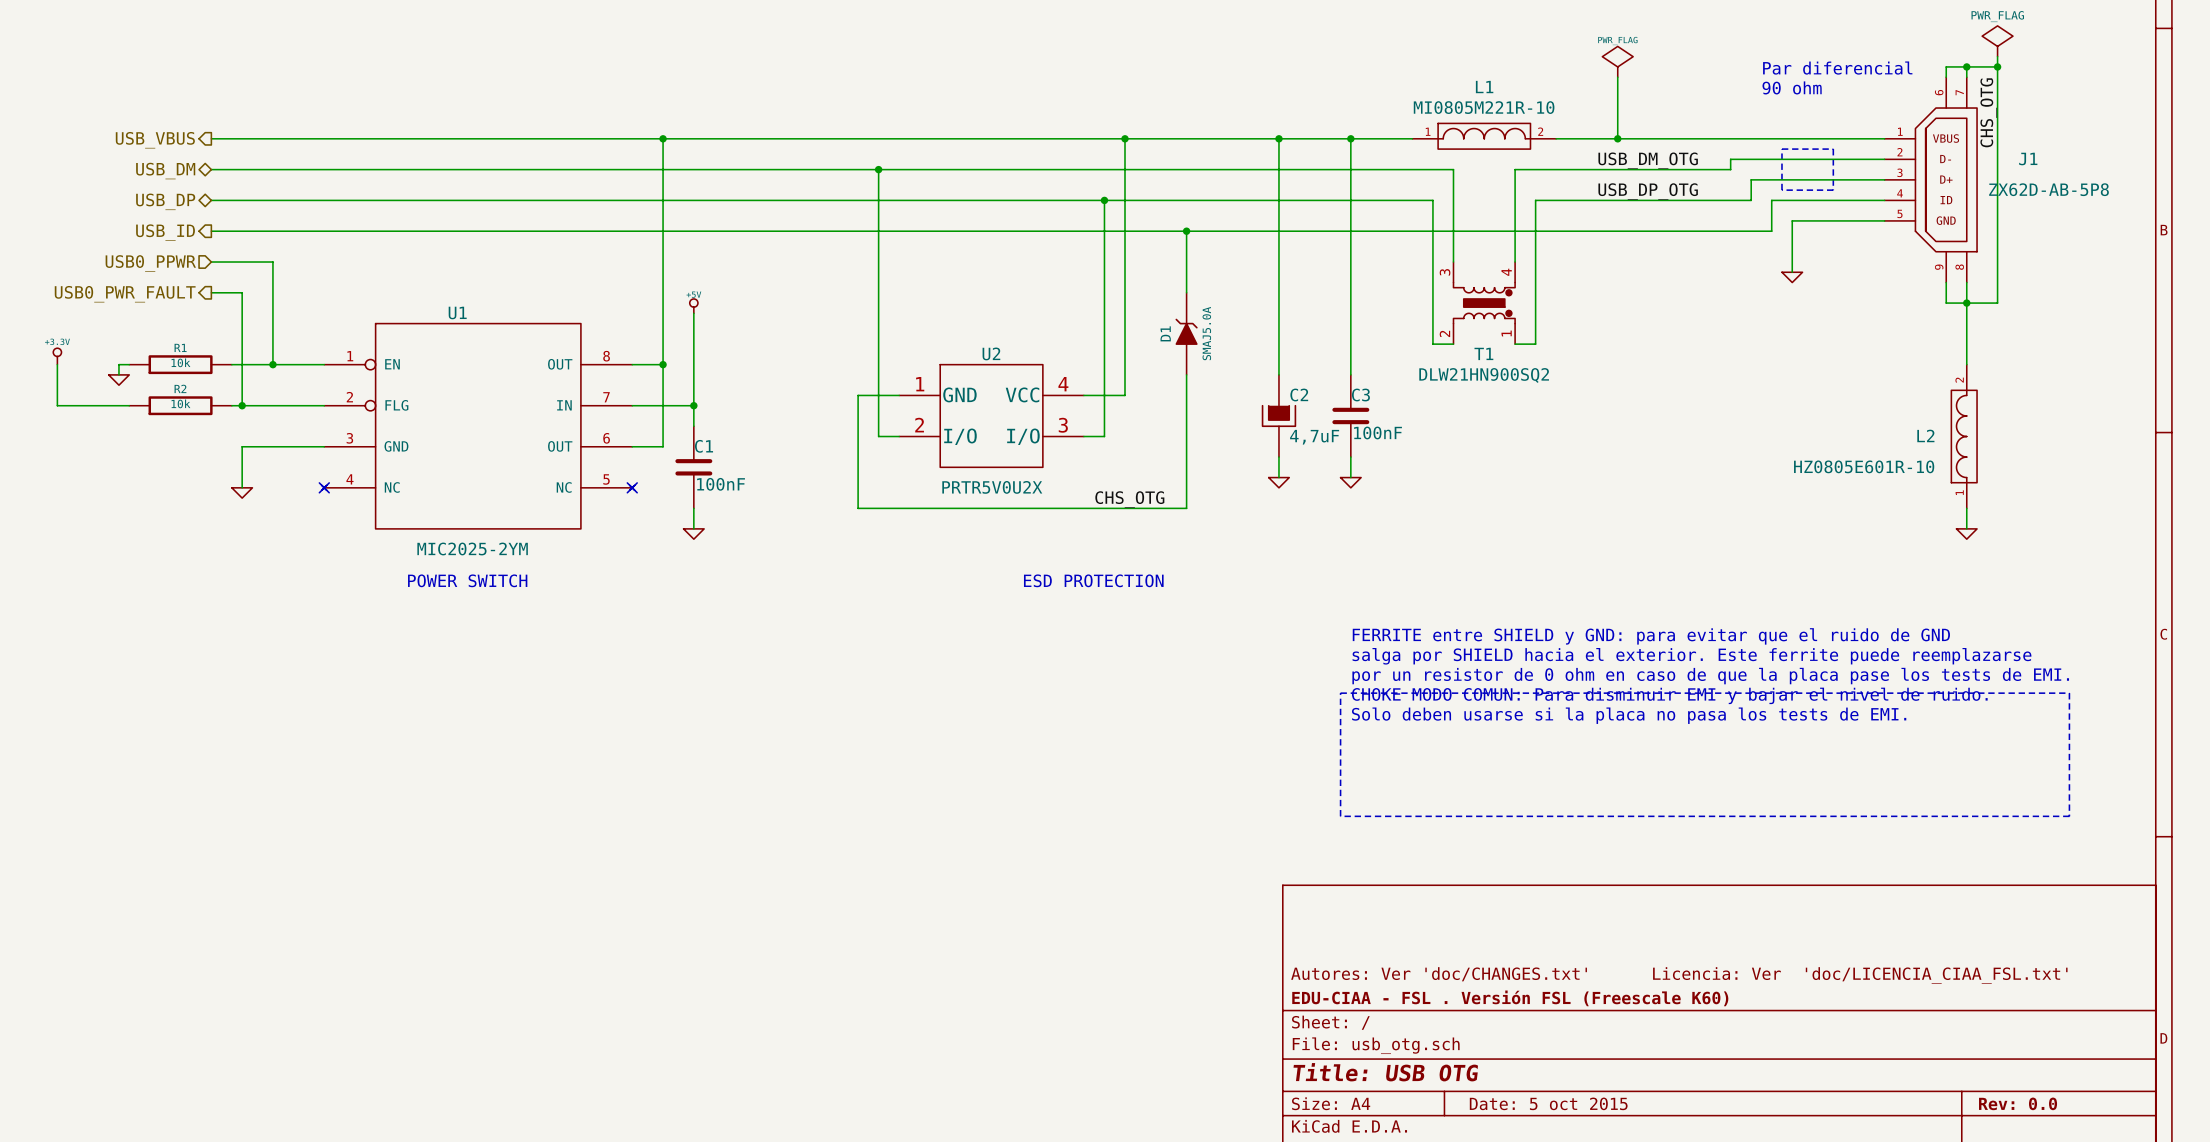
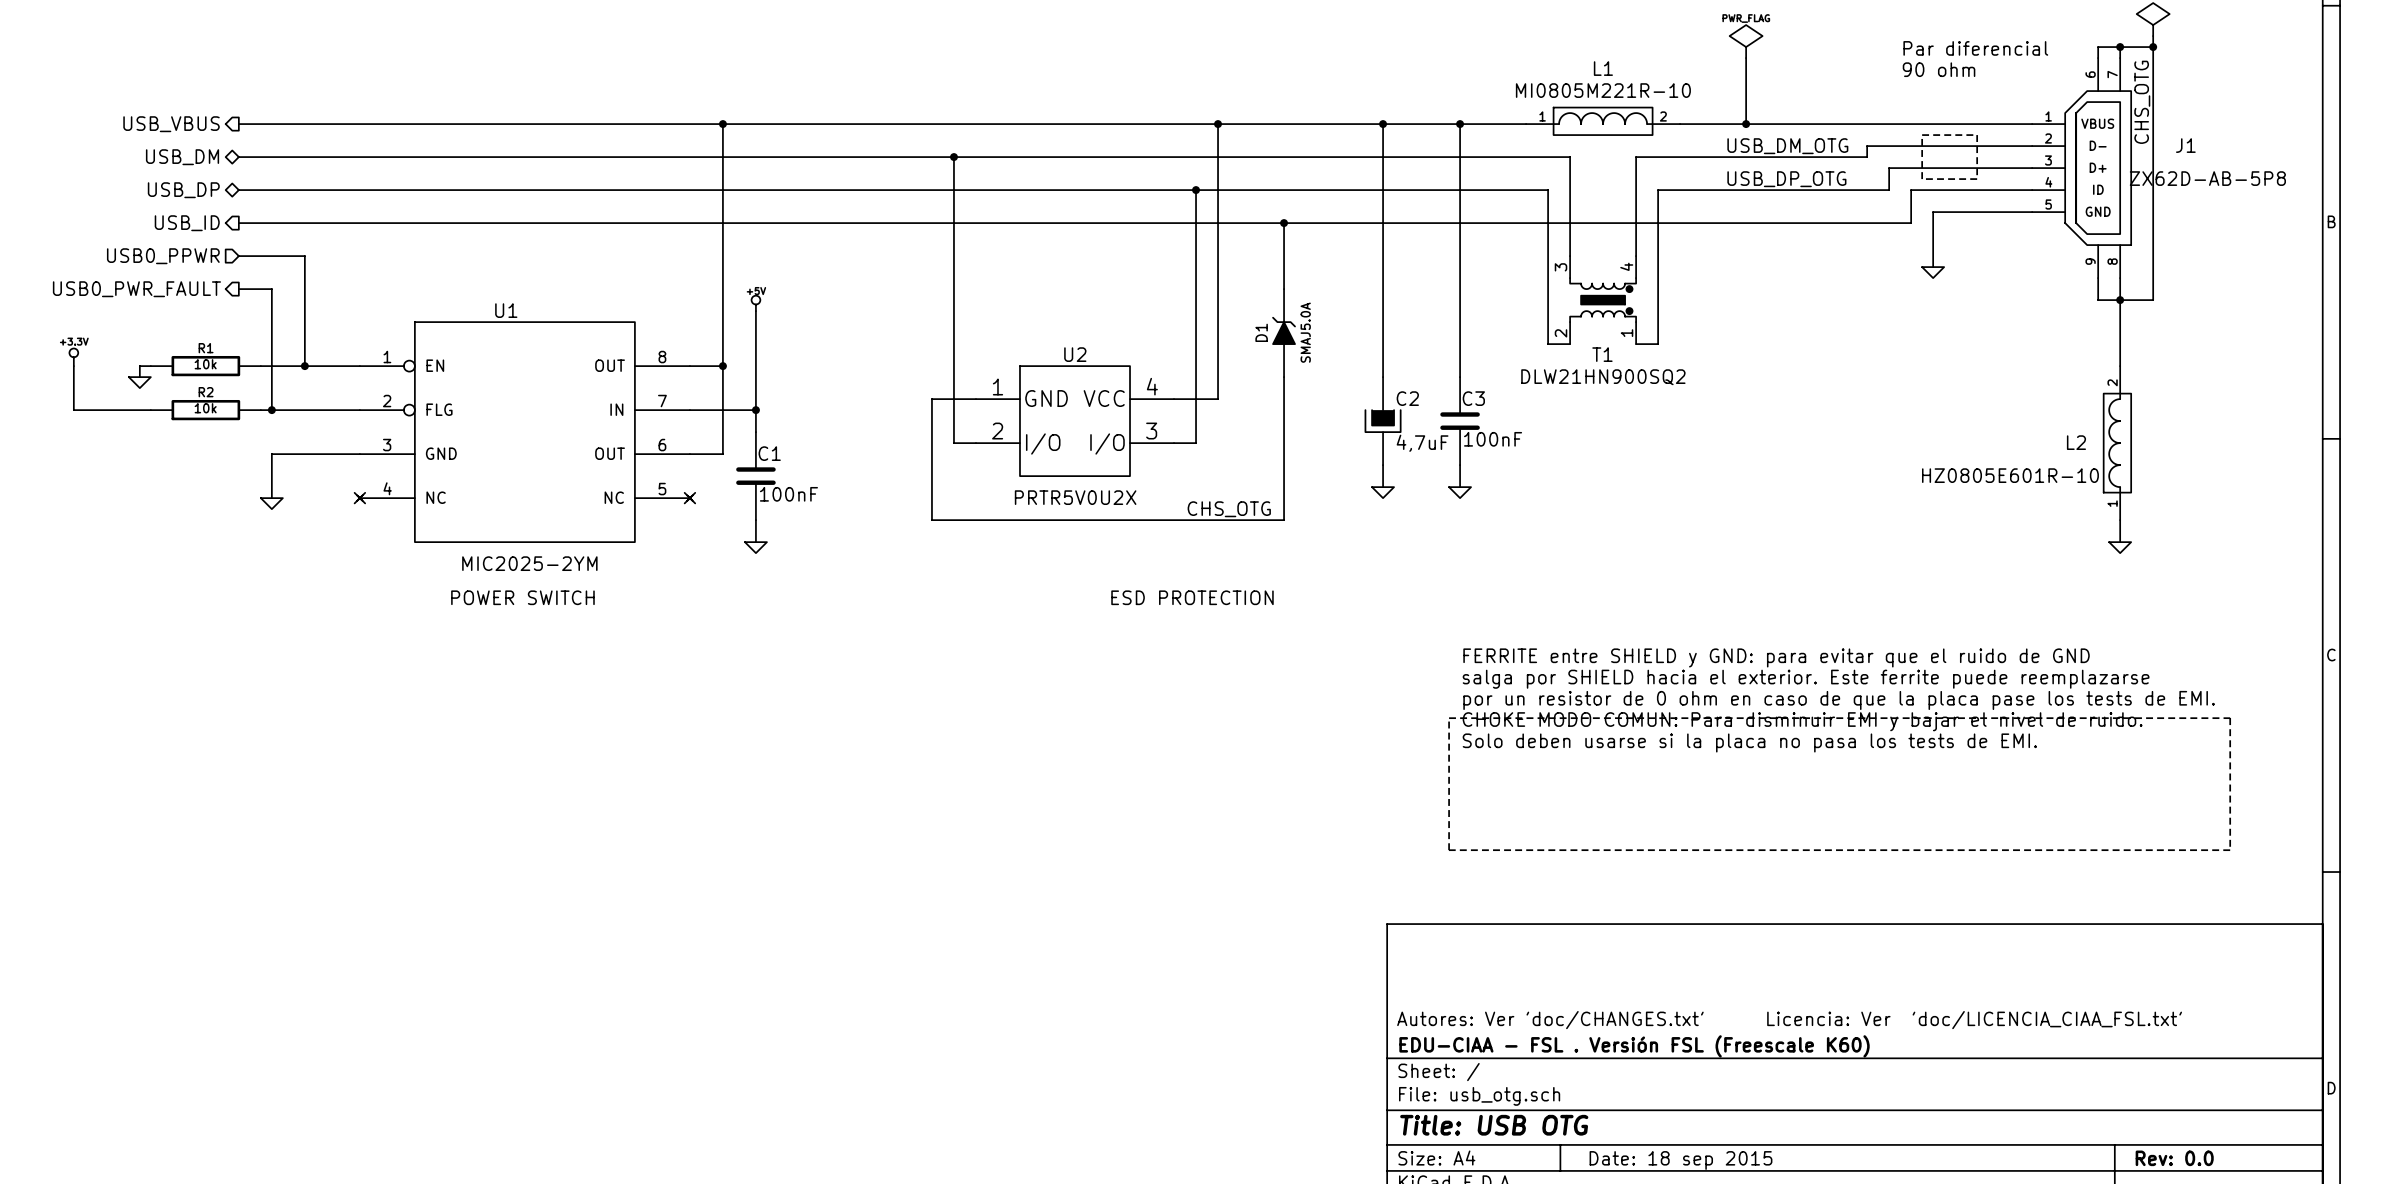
title block: Date: 5 oct 2015 (1548, 1103) -> Date: 18 sep 2015 (1680, 1160)

